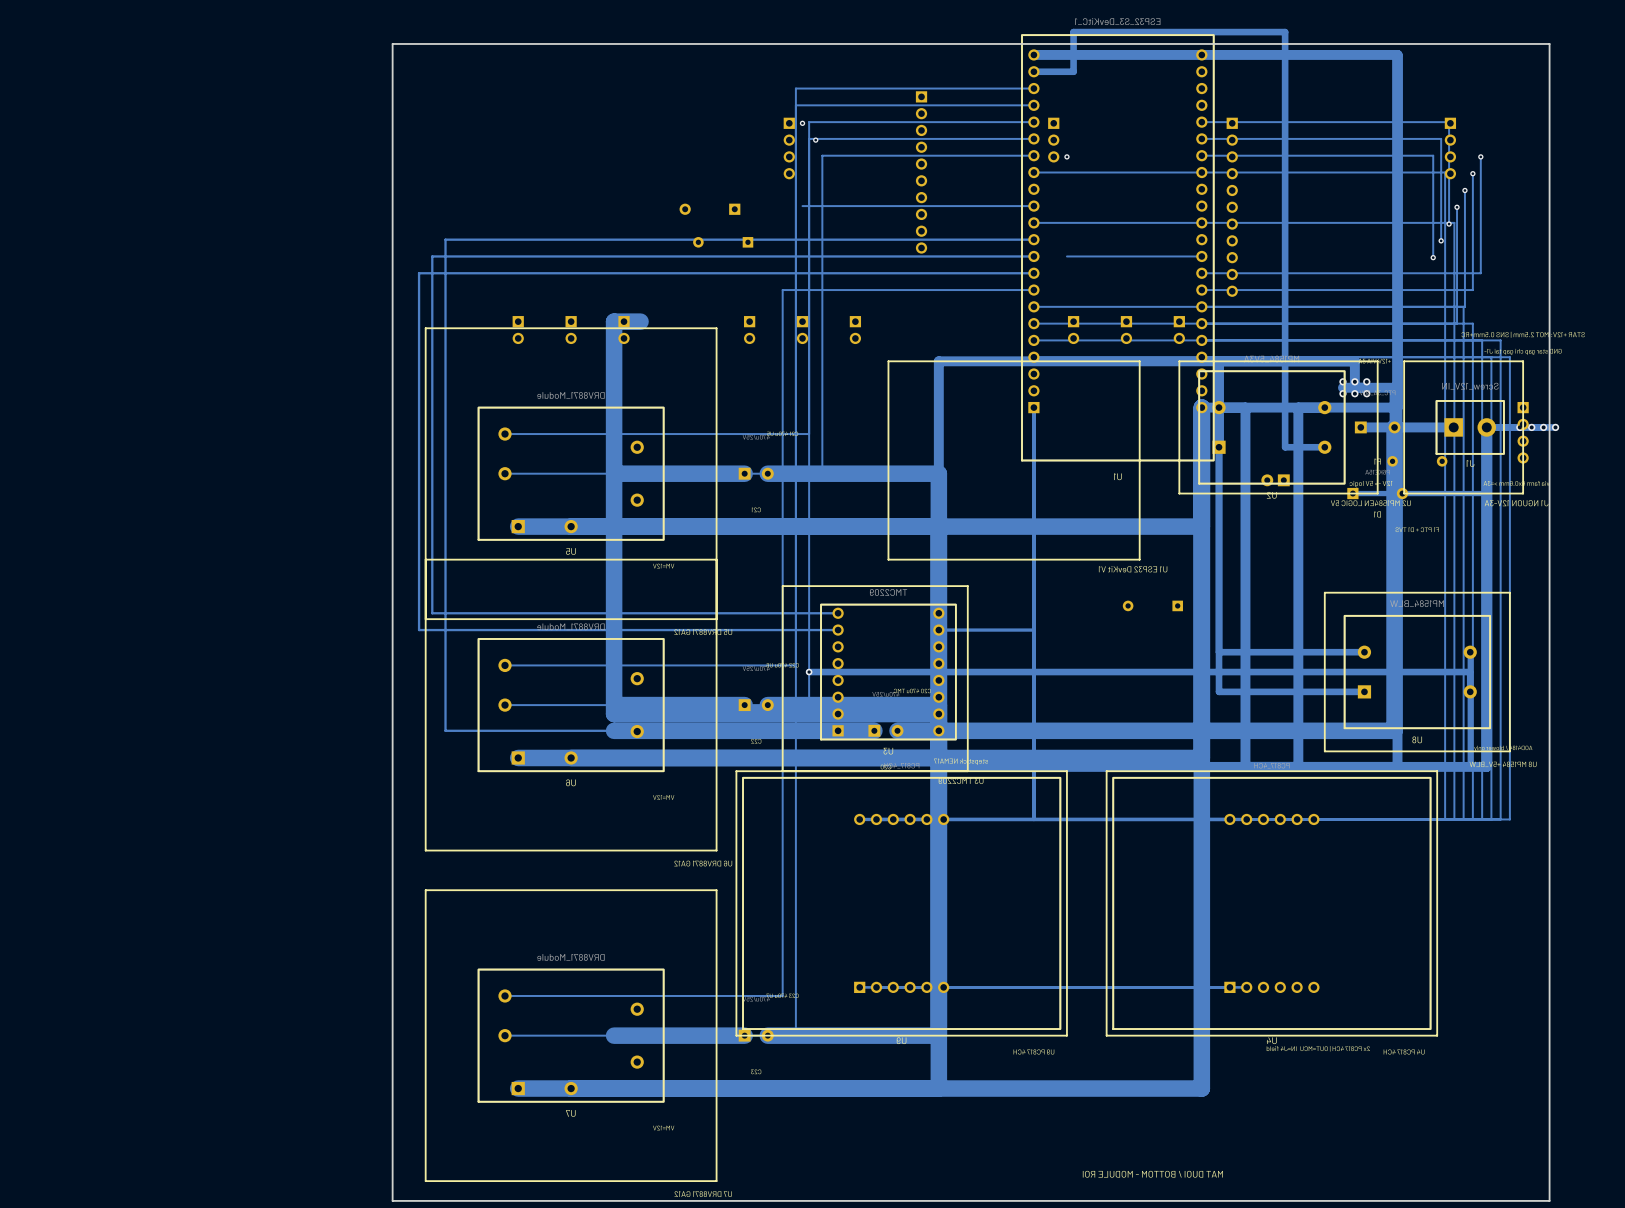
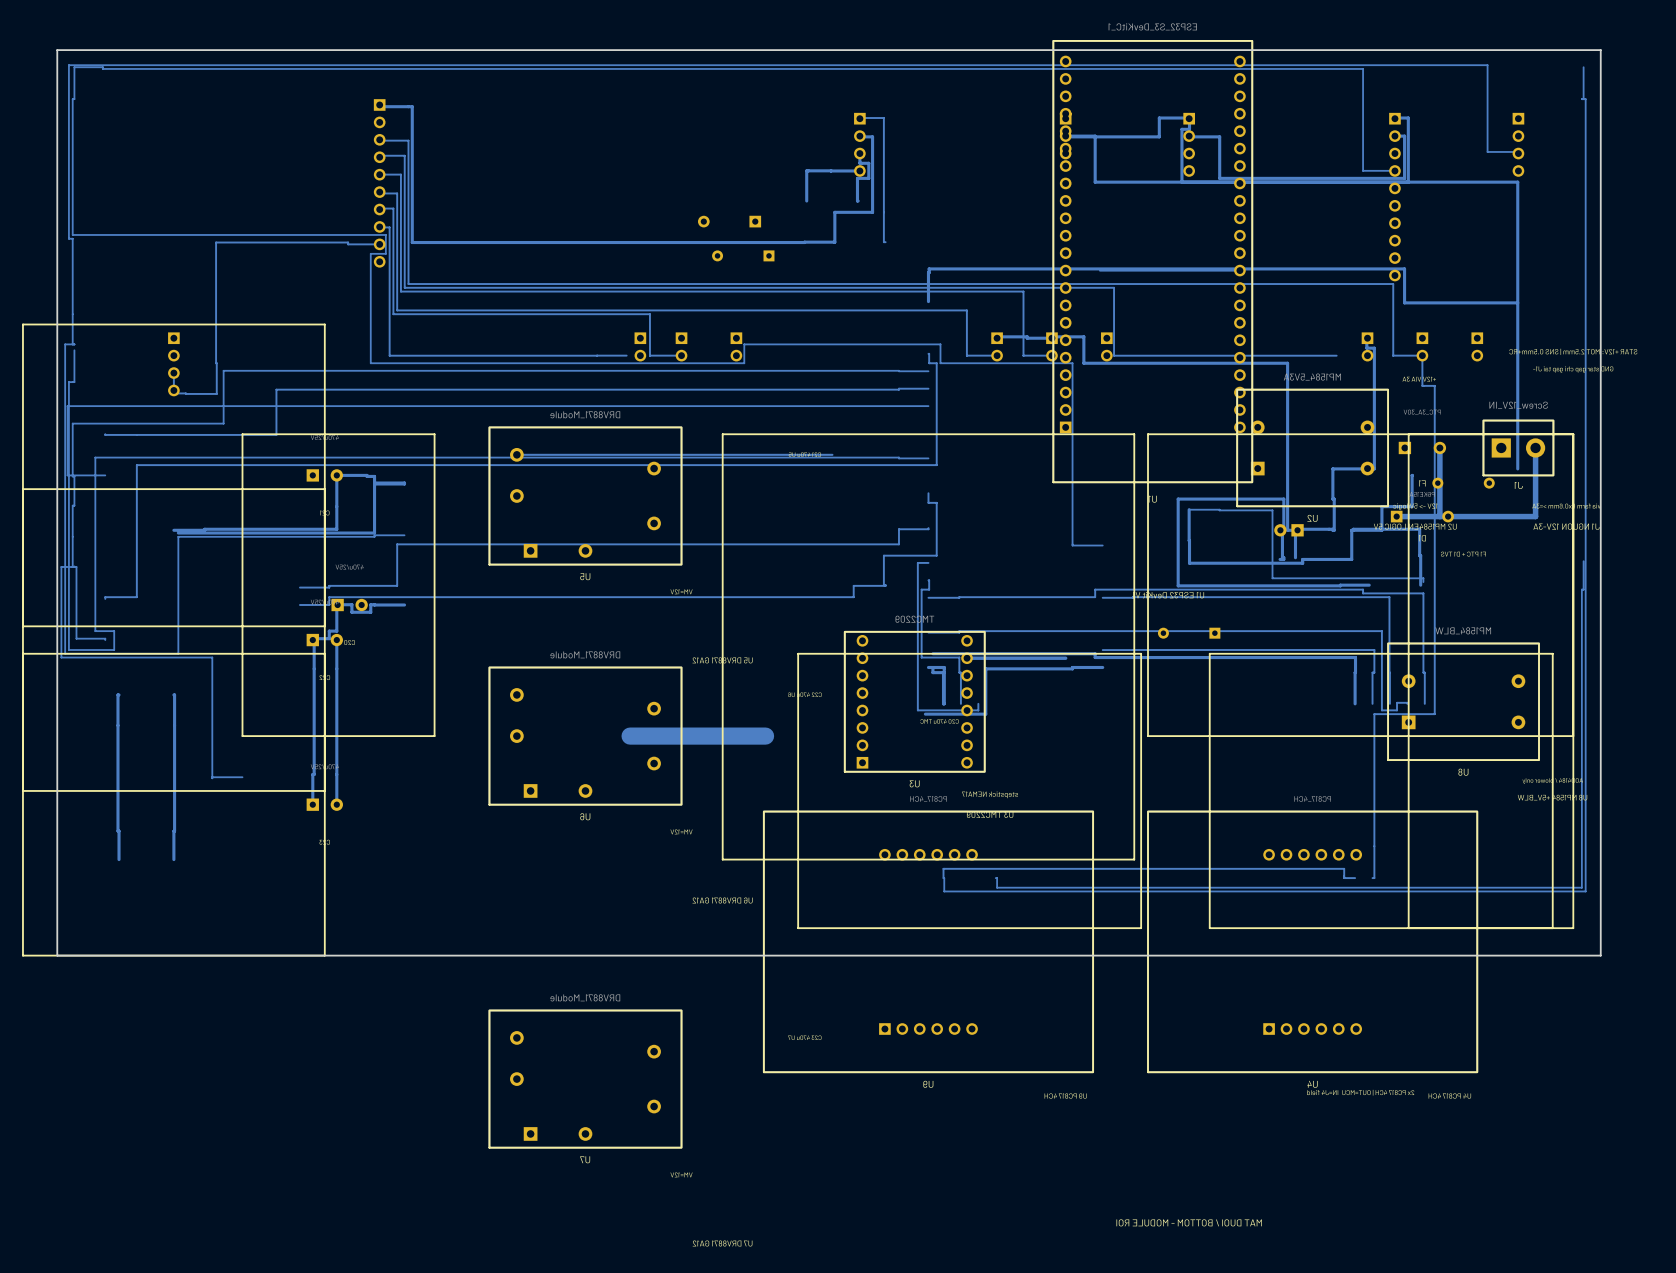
board edge: (392, 43) (392, 1200) (1549, 1200) (1549, 916) -> (400, 50) (57, 50) (57, 955) (1600, 955)
track: (1033, 54) (1397, 54) (1397, 766) -> none
track: none -> (1583, 67) (1583, 99)
track: (1033, 71) (1073, 71) (1073, 32) (1285, 32) (1285, 447) (1324, 447) -> none
track: (1033, 88) (795, 88) (795, 1035) (505, 1035) -> none
track: none -> (1581, 99) (1585, 99) (1585, 891) (944, 891) (943, 868) (1344, 868) (1344, 878) (1355, 878)
track: none -> (379, 104) (379, 106) (412, 106) (412, 242) (834, 242) (834, 212) (872, 212) (872, 136) (859, 136)
track: (1033, 105) (795, 105) -> none
track: none -> (859, 118) (883, 118) (883, 242) (885, 242)
track: none -> (1394, 118) (1408, 118) (1408, 182)
track: (1033, 122) (809, 122) (809, 705) (505, 705) -> none
track: (1201, 122) (1449, 122) (1449, 224) -> none
via: (802, 123) -> none
track: none -> (1394, 136) (1404, 136) (1404, 178) (1219, 178) (1219, 136) (1189, 136)
track: none -> (379, 139) (408, 140) (408, 284) (1393, 284) (1393, 355)
part: none -> (1189, 144)
track: (1033, 138) (809, 138) -> none
track: (1201, 138) (1441, 138) (1441, 240) -> none
via: (815, 140) -> none
part position: (1053, 140) -> (1065, 136)
track: none -> (859, 153) (859, 163) (868, 163) (868, 178) (857, 178) (858, 201)
track: none -> (1518, 153) (1518, 151) (1487, 151) (1487, 65) (68, 65) (68, 238) (72, 238) (72, 344) (74, 344)
track: none -> (379, 157) (379, 155) (404, 155) (404, 287) (1114, 287) (1114, 355) (1336, 355)
part position: (789, 148) -> (859, 144)
part position: (1450, 148) -> (1518, 144)
track: (1033, 155) (822, 155) (822, 473) (505, 473) -> none
track: (1201, 155) (1433, 155) (1433, 257) -> none
via: (1066, 156) -> none
track: (1480, 156) (1480, 273) (1201, 273) -> none
via: (1480, 156) -> none
track: none -> (831, 170) (806, 170) (806, 201)
track: none -> (859, 170) (831, 170)
track: none -> (1394, 170) (1363, 170) (1363, 68) (102, 68) (102, 67) (74, 67) (72, 234) (385, 234) (385, 253) (370, 253) (370, 363) (744, 363) (744, 344) (940, 344) (940, 363) (1072, 363) (1072, 545) (1102, 545)
track: none -> (379, 174) (400, 174) (400, 291) (1023, 291) (1023, 355)
track: none -> (1181, 182) (1181, 129) (1189, 129) (1189, 118) (1159, 118) (1159, 136) (1065, 136) (1065, 136) (1095, 136) (1095, 182) (1517, 182) (1517, 468)
part: none -> (379, 183)
part: (921, 172) -> none
track: (1033, 172) (1445, 172) (1445, 819) -> none
track: (1472, 173) (1472, 290) (1201, 290) -> none
via: (1472, 173) -> none
track: none -> (379, 192) (397, 193) (397, 310) (966, 310) (966, 355)
part: none -> (1394, 197)
track: (1464, 190) (1464, 306) (1033, 306) -> none
via: (1464, 190) -> none
track: none -> (379, 209) (393, 208) (393, 314) (649, 314) (649, 355)
track: (1033, 206) (802, 206) -> none
part: (1232, 207) -> none
track: (1457, 207) (1457, 323) -> none
via: (1457, 207) -> none
track: none -> (379, 226) (389, 227) (389, 355) (597, 355)
track: (1033, 222) (1454, 222) (1454, 819) -> none
via: (1449, 224) -> none
track: none -> (379, 244) (216, 242) (216, 393) (173, 393) (173, 373)
track: (1033, 239) (445, 239) (445, 730) (838, 730) -> none
via: (1441, 240) -> none
track: (1033, 256) (432, 256) (432, 613) (838, 613) -> none
via: (1433, 257) -> none
track: (1033, 273) (419, 273) (419, 630) (838, 630) -> none
track: none -> (928, 301) (929, 268) (1404, 268) (1404, 302) (1517, 302)
track: (1033, 290) (782, 290) (782, 995) (505, 995) -> none
track: (1463, 306) (1463, 819) -> none
line: none -> (324, 324) (22, 324) (22, 955) (324, 955) (324, 324)
track: (640, 321) (614, 321) (614, 714) (938, 714) -> none
track: none -> (997, 338) (1083, 336) (1083, 363) (1287, 363) (1287, 530) (1298, 529)
track: none -> (1367, 338) (1366, 348) (1374, 348) (1374, 468) (1332, 468) (1334, 530) (1295, 529)
track: (1033, 323) (1472, 323) (1472, 819) -> none
track: none -> (74, 344) (65, 344) (65, 653) (178, 653) (178, 536) (404, 535)
part: (518, 330) -> none
part: (571, 330) -> none
part: none -> (681, 346)
part position: (749, 330) -> (736, 346)
part: (802, 330) -> none
part: (855, 330) -> none
part: none -> (997, 346)
part: none -> (1051, 346)
part: (1126, 330) -> none
part: (1179, 330) -> none
part: none -> (1367, 346)
part: none -> (1422, 346)
part: none -> (1477, 346)
track: none -> (74, 350) (74, 382) (68, 382) (68, 649) (114, 649) (114, 631) (95, 631) (95, 457) (928, 458)
track: none -> (928, 353) (929, 363) (936, 363) (936, 465) (136, 465) (136, 597) (105, 597) (105, 598)
track: none -> (626, 355) (597, 355)
track: none -> (681, 355) (649, 355)
track: none -> (997, 355) (966, 355)
track: none -> (1051, 355) (1023, 355)
track: none -> (1393, 355) (1422, 355) (1422, 385) (1434, 385) (1434, 714) (1374, 714) (1374, 878) (1372, 878)
track: (1033, 340) (1500, 340) (1500, 819) -> none
track: (1482, 340) (1482, 819) -> none
part: none -> (173, 364)
track: none -> (928, 371) (223, 370) (223, 423) (72, 423) (72, 476) (74, 476) (72, 566)
track: (1033, 357) (1509, 357) (1509, 819) (893, 819) -> none
track: (1491, 357) (1491, 819) -> none
line: (1139, 361) (888, 361) (888, 559) (1139, 559) (1139, 361) -> none
track: (1219, 361) (1219, 447) -> none
line: (1377, 361) (1179, 361) (1179, 493) (1377, 493) (1377, 361) -> none
track: none -> (928, 388) (276, 389) (276, 434) (105, 434)
via: (1342, 381) -> none
via: (1354, 381) -> none
via: (1366, 381) -> none
track: none -> (928, 406) (67, 406) (67, 475) (105, 475)
track: (1342, 387) (1394, 387) (1394, 730) (897, 730) -> none
track: (1354, 387) (1354, 361) (938, 361) (938, 766) (1486, 766) (1486, 427) (1555, 427) -> none
via: (1342, 393) -> none
via: (1354, 393) -> none
via: (1366, 393) -> none
track: (1033, 407) (1033, 819) -> none
track: (1201, 407) (1201, 1088) (518, 1088) -> none
track: (1219, 407) (1219, 691) (1364, 691) -> none
track: (1245, 407) (1245, 766) -> none
track: (1298, 407) (1298, 766) (1470, 766) (1470, 652) -> none
track: (1397, 407) (1201, 407) -> none
line: (425, 414) (425, 328) (716, 328) (716, 850) (425, 850) (425, 705) -> (434, 434) (242, 434) (242, 736) (434, 736)
line: none -> (1134, 434) (722, 434) (722, 859) (1134, 859) (1134, 434)
line: none -> (1408, 434) (1408, 928)
line: (1523, 414) (1523, 361) (1404, 361) (1404, 493) (1523, 493) -> (1573, 434) (1148, 434) (1148, 736) (1573, 736)
track: (1453, 427) (1360, 427) -> none
via: (1519, 427) -> none
via: (1531, 427) -> none
via: (1543, 427) -> none
via: (1555, 427) -> none
part: (1523, 432) -> none
track: none -> (1412, 475) (1412, 506) (1381, 506) (1381, 530) (1351, 530) (1351, 559) (1302, 559) (1302, 563) (1189, 563) (1189, 509) (1272, 510) (1272, 578) (1423, 578) (1423, 582)
track: none -> (374, 483) (404, 483) (374, 483)
line: none -> (324, 489) (22, 489)
track: none -> (928, 493) (928, 502) (936, 502) (936, 555) (883, 555) (883, 585) (885, 585) (853, 585) (853, 597) (329, 597) (329, 604) (299, 604)
track: (744, 473) (614, 473) -> none
part position: (756, 473) -> (324, 475)
track: (767, 473) (938, 473) (938, 1088) -> none
part position: (1275, 480) -> (1288, 530)
line: none -> (1573, 516) (1573, 928) (1209, 928) (1209, 653) (1552, 653) (1552, 928)
track: none -> (928, 528) (898, 529) (898, 544) (397, 544) (397, 585) (299, 587)
track: none -> (1295, 529) (1295, 557)
track: none -> (173, 530) (336, 529) (336, 475) (374, 476) (374, 533) (178, 533)
track: none -> (1353, 530) (1419, 529) (1420, 585)
track: (1201, 526) (518, 526) -> none
track: none -> (1280, 559) (1283, 559) (1283, 499) (1178, 499) (1178, 585) (1369, 585)
track: none -> (1583, 561) (1583, 589) (1581, 589) (1581, 887) (997, 887) (995, 878)
track: none -> (928, 562) (917, 562) (917, 710) (978, 710) (978, 703)
track: none -> (928, 580) (929, 589) (921, 589) (921, 657) (959, 657) (960, 703)
line: (716, 559) (425, 559) -> none
track: none -> (928, 597) (1095, 597) (1095, 589) (1363, 589) (1363, 593) (1423, 593) (1424, 703)
track: none -> (1102, 597) (1389, 597) (1389, 703)
track: none -> (404, 604) (370, 604) (370, 612) (351, 612) (351, 604) (336, 604) (336, 631) (329, 631) (329, 638) (312, 638) (312, 804)
line: (1509, 592) (1324, 592) (1324, 751) (1509, 751) (1509, 592) -> none
line: none -> (324, 626) (22, 626)
track: none -> (928, 632) (1381, 631) (1381, 710) (1397, 710) (1397, 702) (1407, 703)
track: none -> (105, 640) (76, 638) (76, 566) (61, 566) (61, 657) (212, 657) (212, 778)
track: none -> (336, 640) (336, 804)
line: (716, 619) (425, 619) -> none
track: none -> (1132, 649) (1374, 649) (1372, 703)
track: none -> (1132, 650) (1102, 650)
line: none -> (324, 653) (22, 653)
track: none -> (932, 653) (1095, 653) (1095, 657) (1355, 657) (1355, 703)
track: none -> (928, 667) (944, 667) (944, 703) (943, 672)
track: none -> (1102, 667) (985, 668) (985, 714) (925, 714)
track: none -> (932, 668) (932, 672) (944, 672)
track: (1364, 652) (1219, 652) -> none
track: none -> (119, 694) (119, 859)
track: none -> (173, 694) (173, 859)
track: (795, 665) (505, 665) -> none
track: (809, 672) (1470, 672) (1470, 691) -> none
via: (809, 672) -> none
part position: (756, 705) -> (324, 640)
track: (938, 705) (767, 705) -> none
track: (874, 730) (614, 730) -> none
part position: (885, 730) -> (349, 604)
track: none -> (242, 777) (212, 777)
line: none -> (324, 790) (22, 790)
track: (1201, 757) (518, 757) -> none
line: (967, 771) (967, 586) (782, 586) (782, 771) -> none
line: (1066, 771) (736, 771) (736, 1035) (1066, 1035) (1066, 771) -> none
line: (1106, 771) (1437, 771) (1437, 1035) (1106, 1035) (1106, 890) -> (1141, 804) (1141, 653) (798, 653) (798, 928) (1141, 928)
track: (1246, 819) (859, 819) -> none
line: (716, 890) (716, 1181) (425, 1181) (425, 890) (716, 890) -> none
track: (1246, 987) (859, 987) -> none
track: (744, 1035) (614, 1035) -> none
part position: (756, 1035) -> (324, 804)
track: (938, 1035) (767, 1035) -> none

